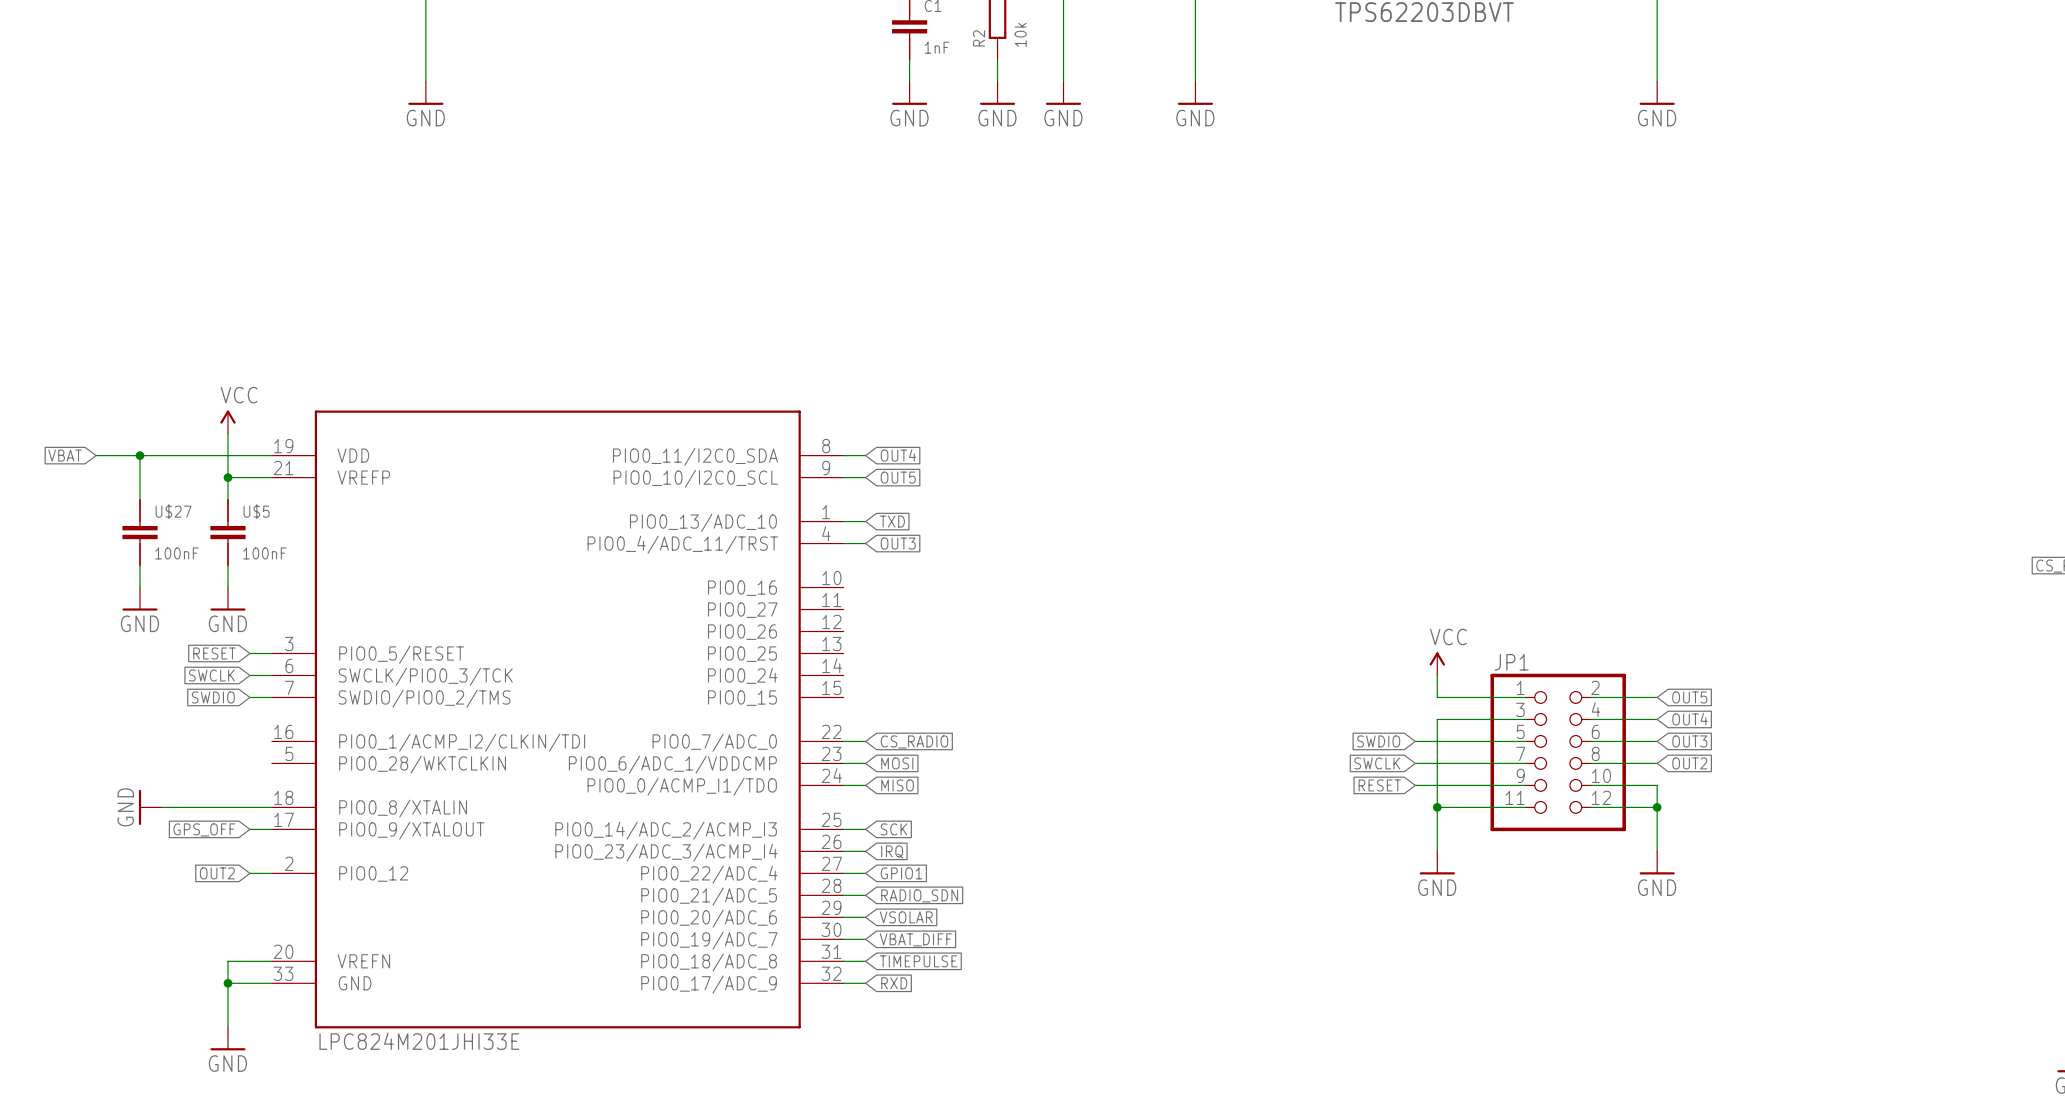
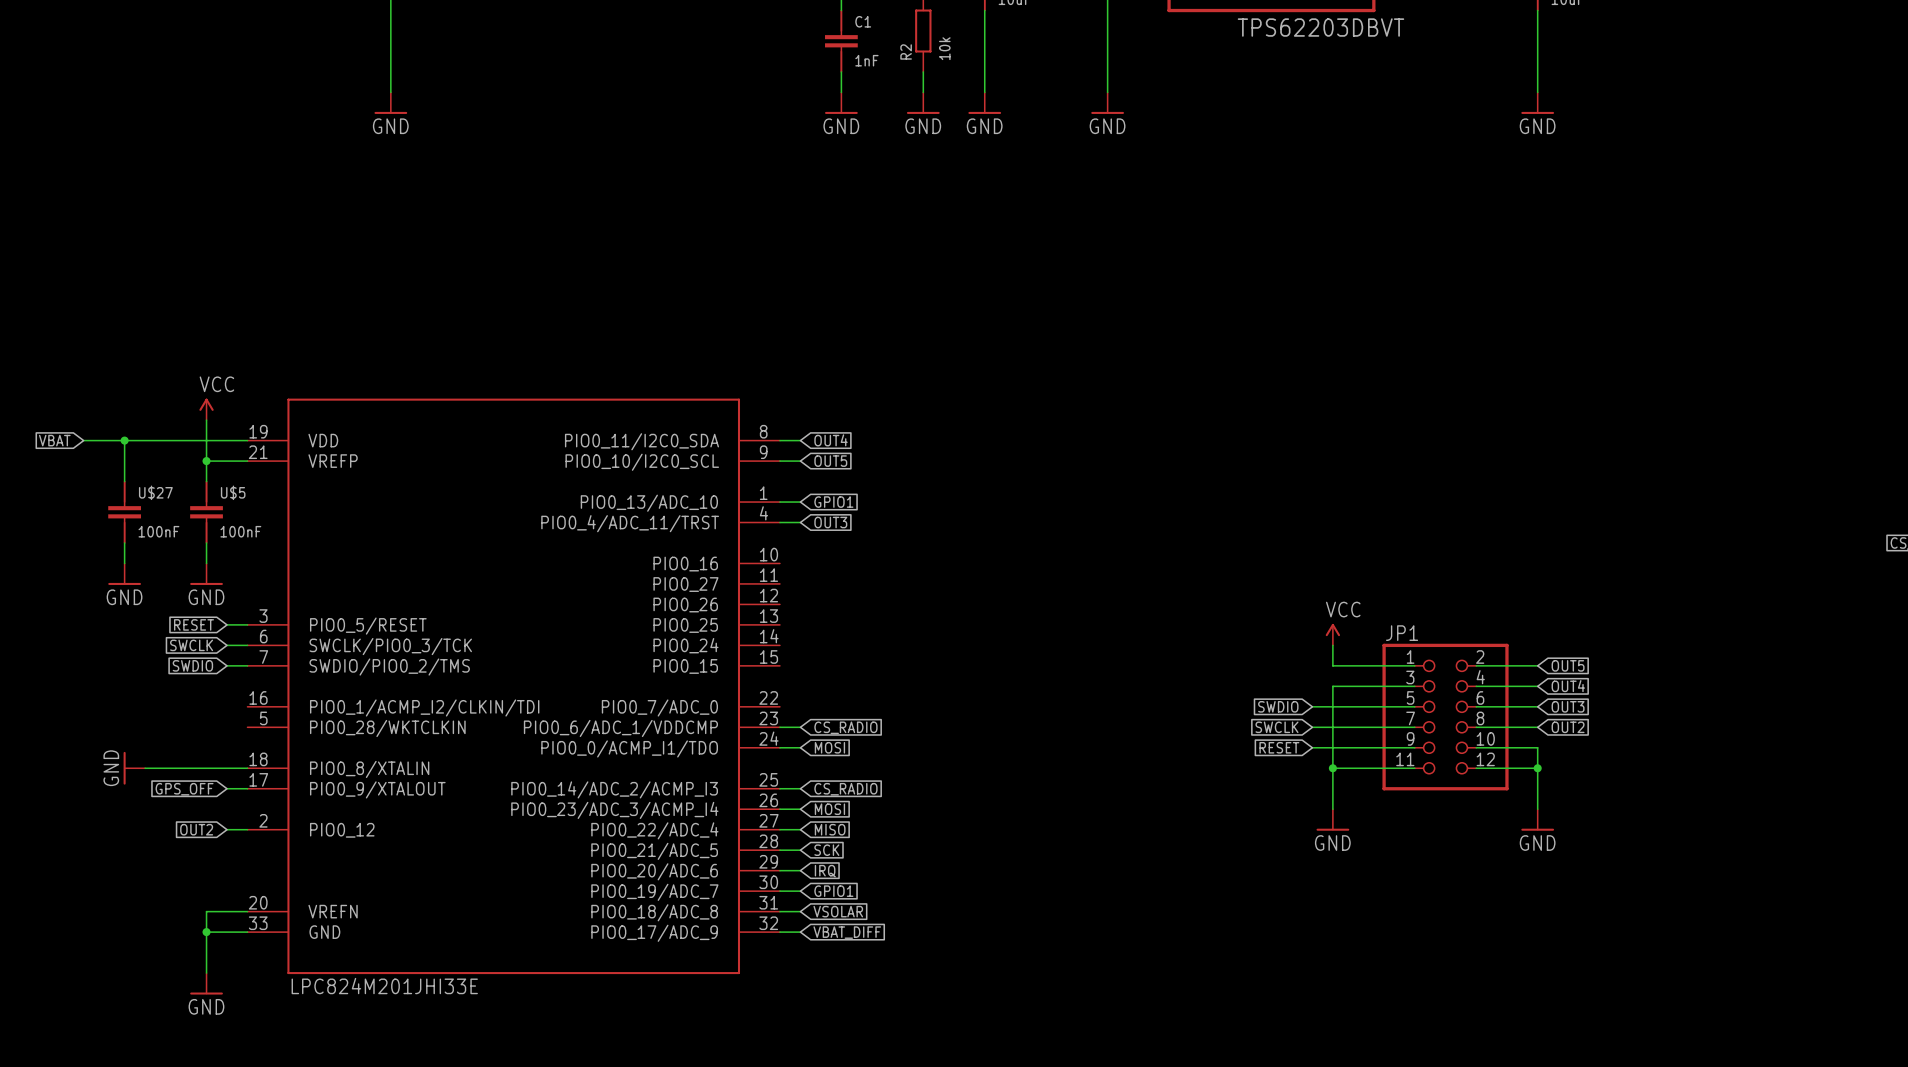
global label: TXD (892, 521) -> GPIO1 (833, 502)
wire: (843, 741) (865, 741) -> none
global label: CS_RADIO (914, 741) -> none
global label: MOSI (897, 763) -> CS_RADIO (845, 727)
global label: MISO (897, 785) -> MOSI (829, 747)
global label: SCK (893, 829) -> CS_RADIO (845, 789)
global label: IRQ (892, 851) -> MOSI (829, 809)
global label: GPIO1 (901, 873) -> MISO (830, 829)
global label: RADIO_SDN (919, 895) -> SCK (826, 850)
global label: VSOLAR (906, 917) -> IRQ (825, 871)
global label: VBAT_DIFF (915, 939) -> GPIO1 (833, 891)
global label: TIMEPULSE (918, 961) -> VSOLAR (838, 911)
global label: RXD (894, 983) -> VBAT_DIFF (847, 932)

